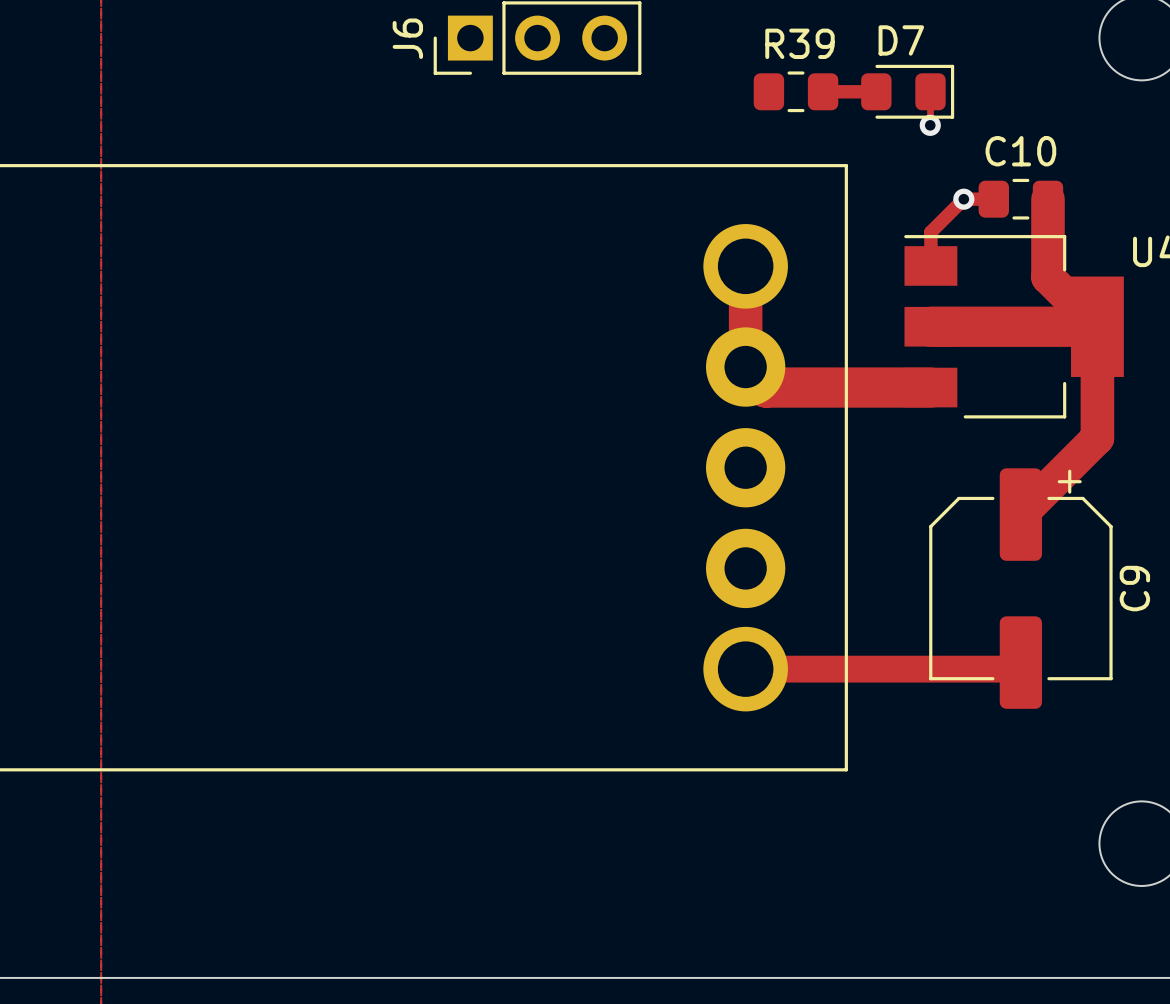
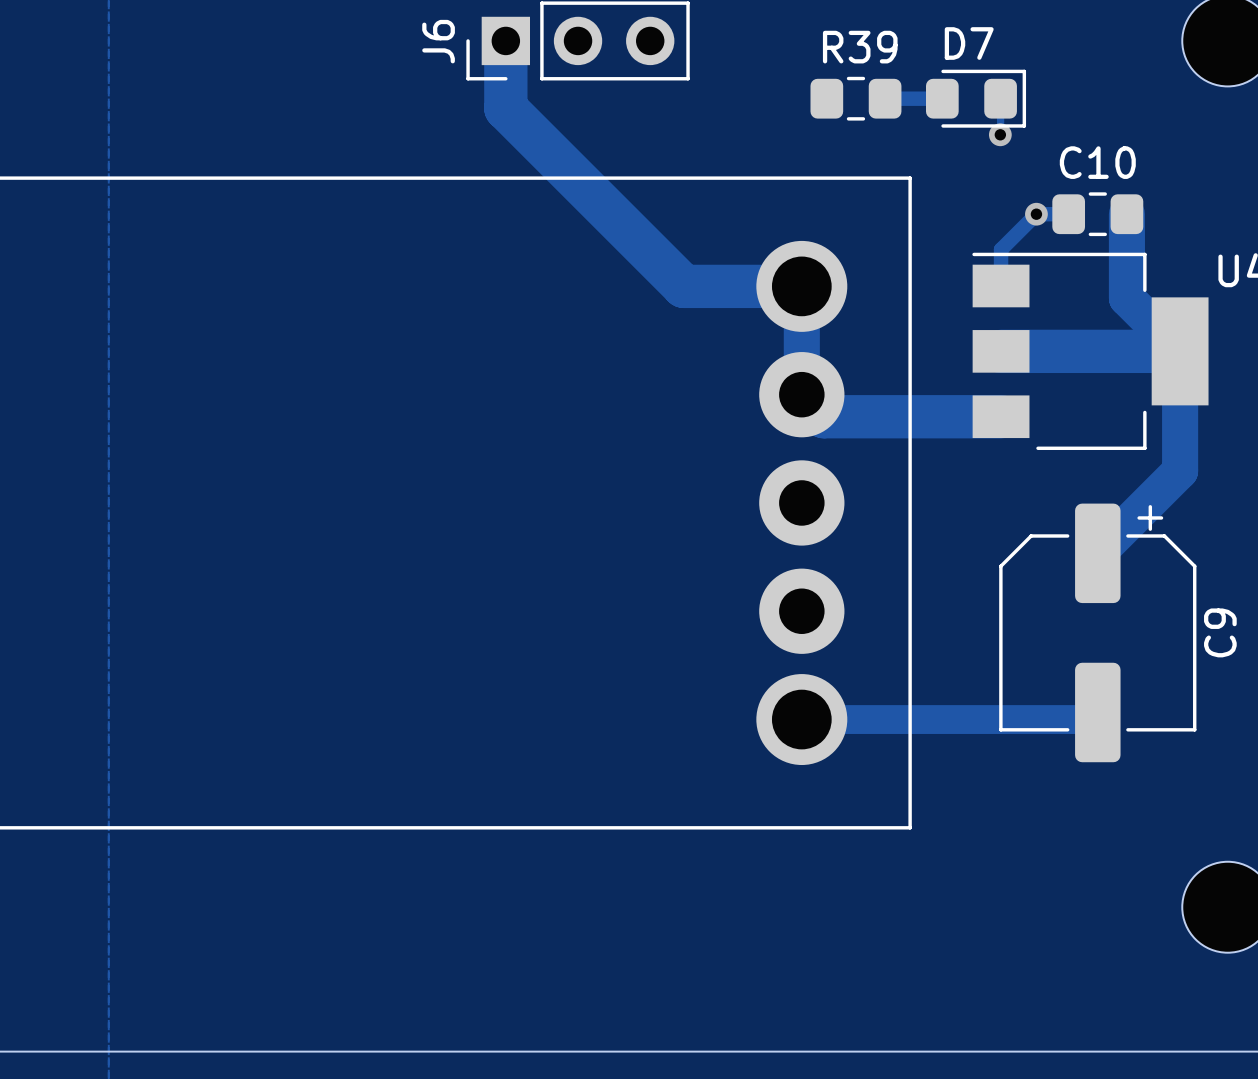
track: none -> (505, 40) (505, 108) (683, 286) (801, 286)

